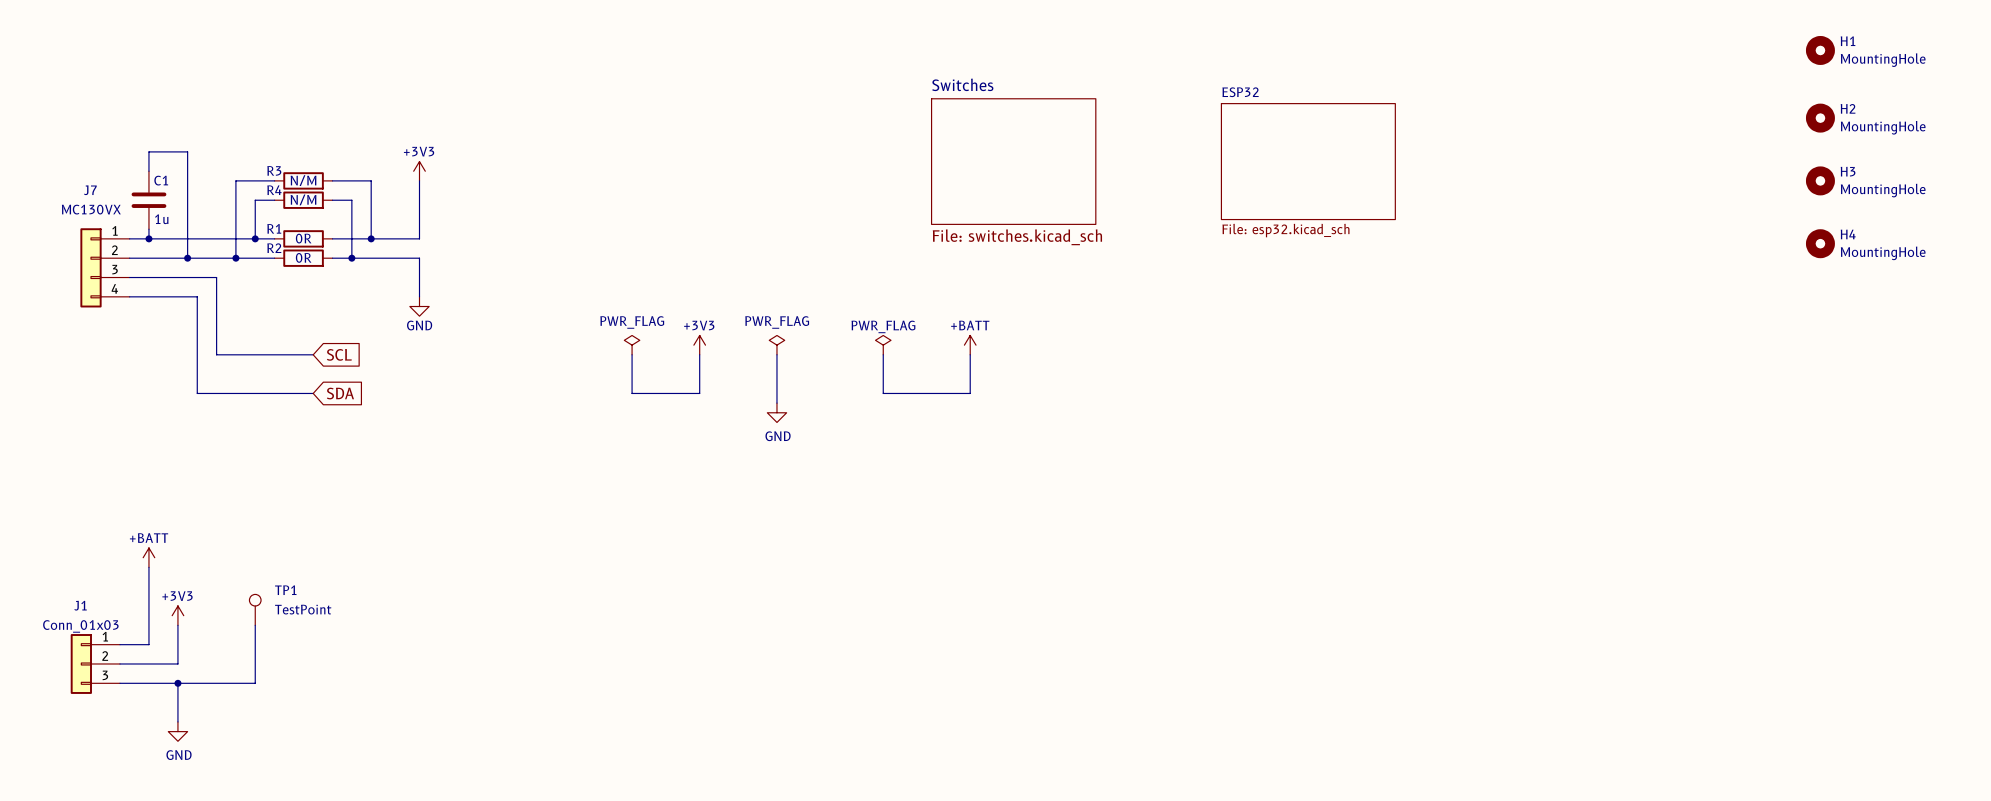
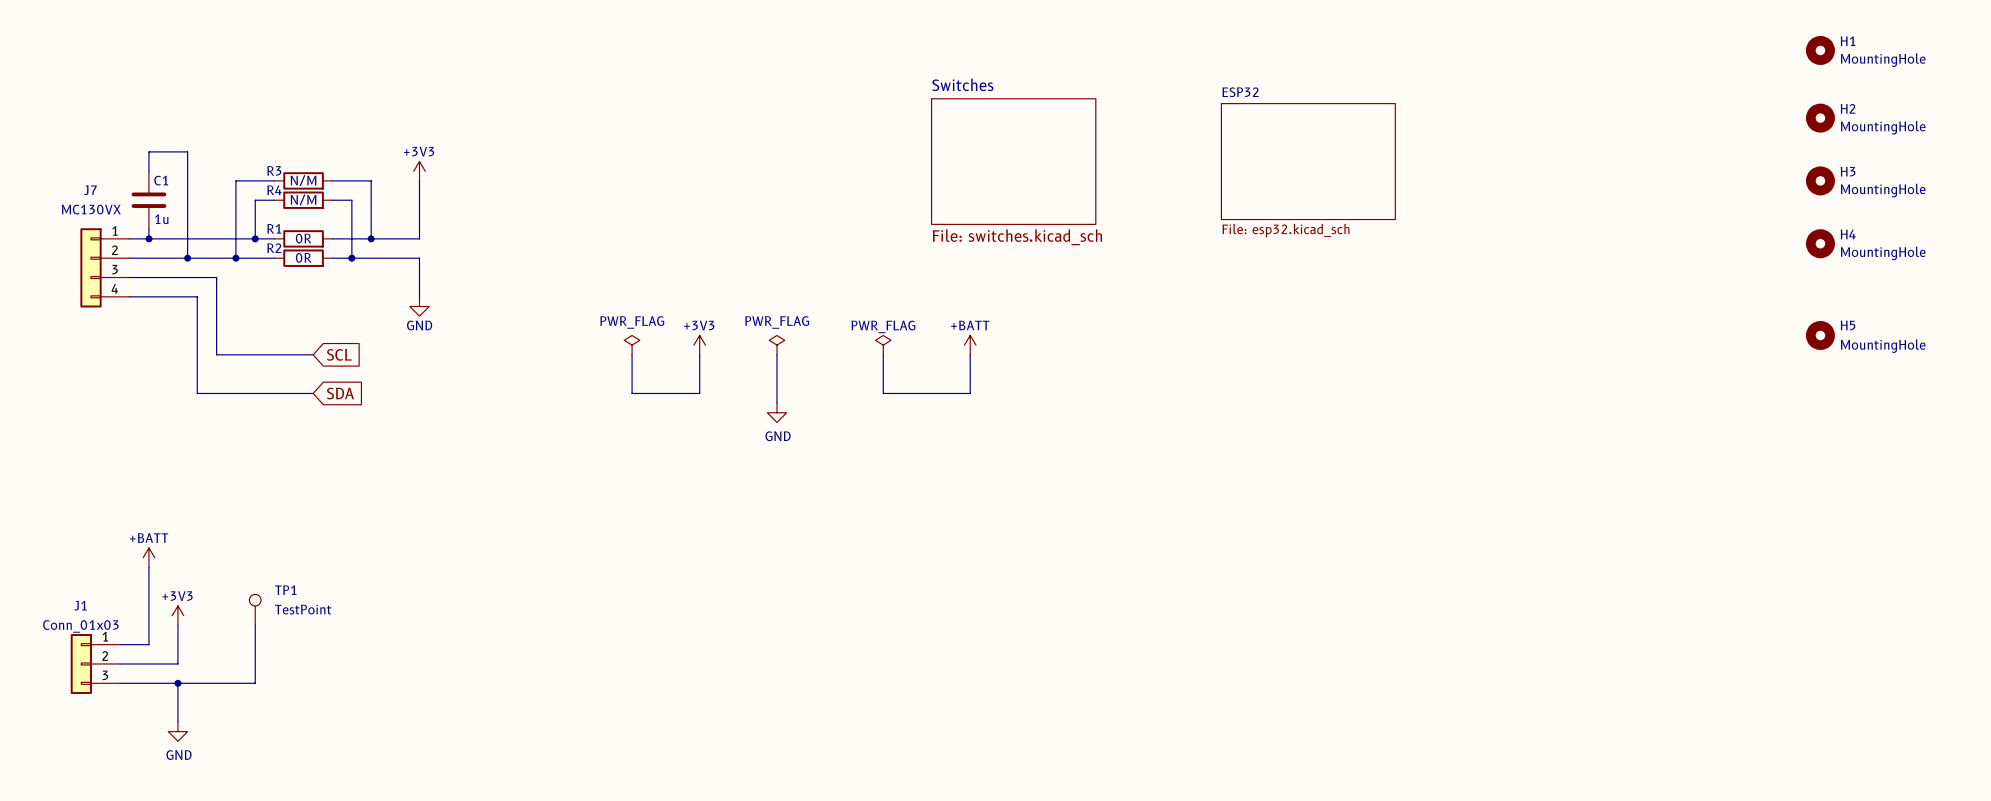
H5: none -> MountingHole (1820, 335)

